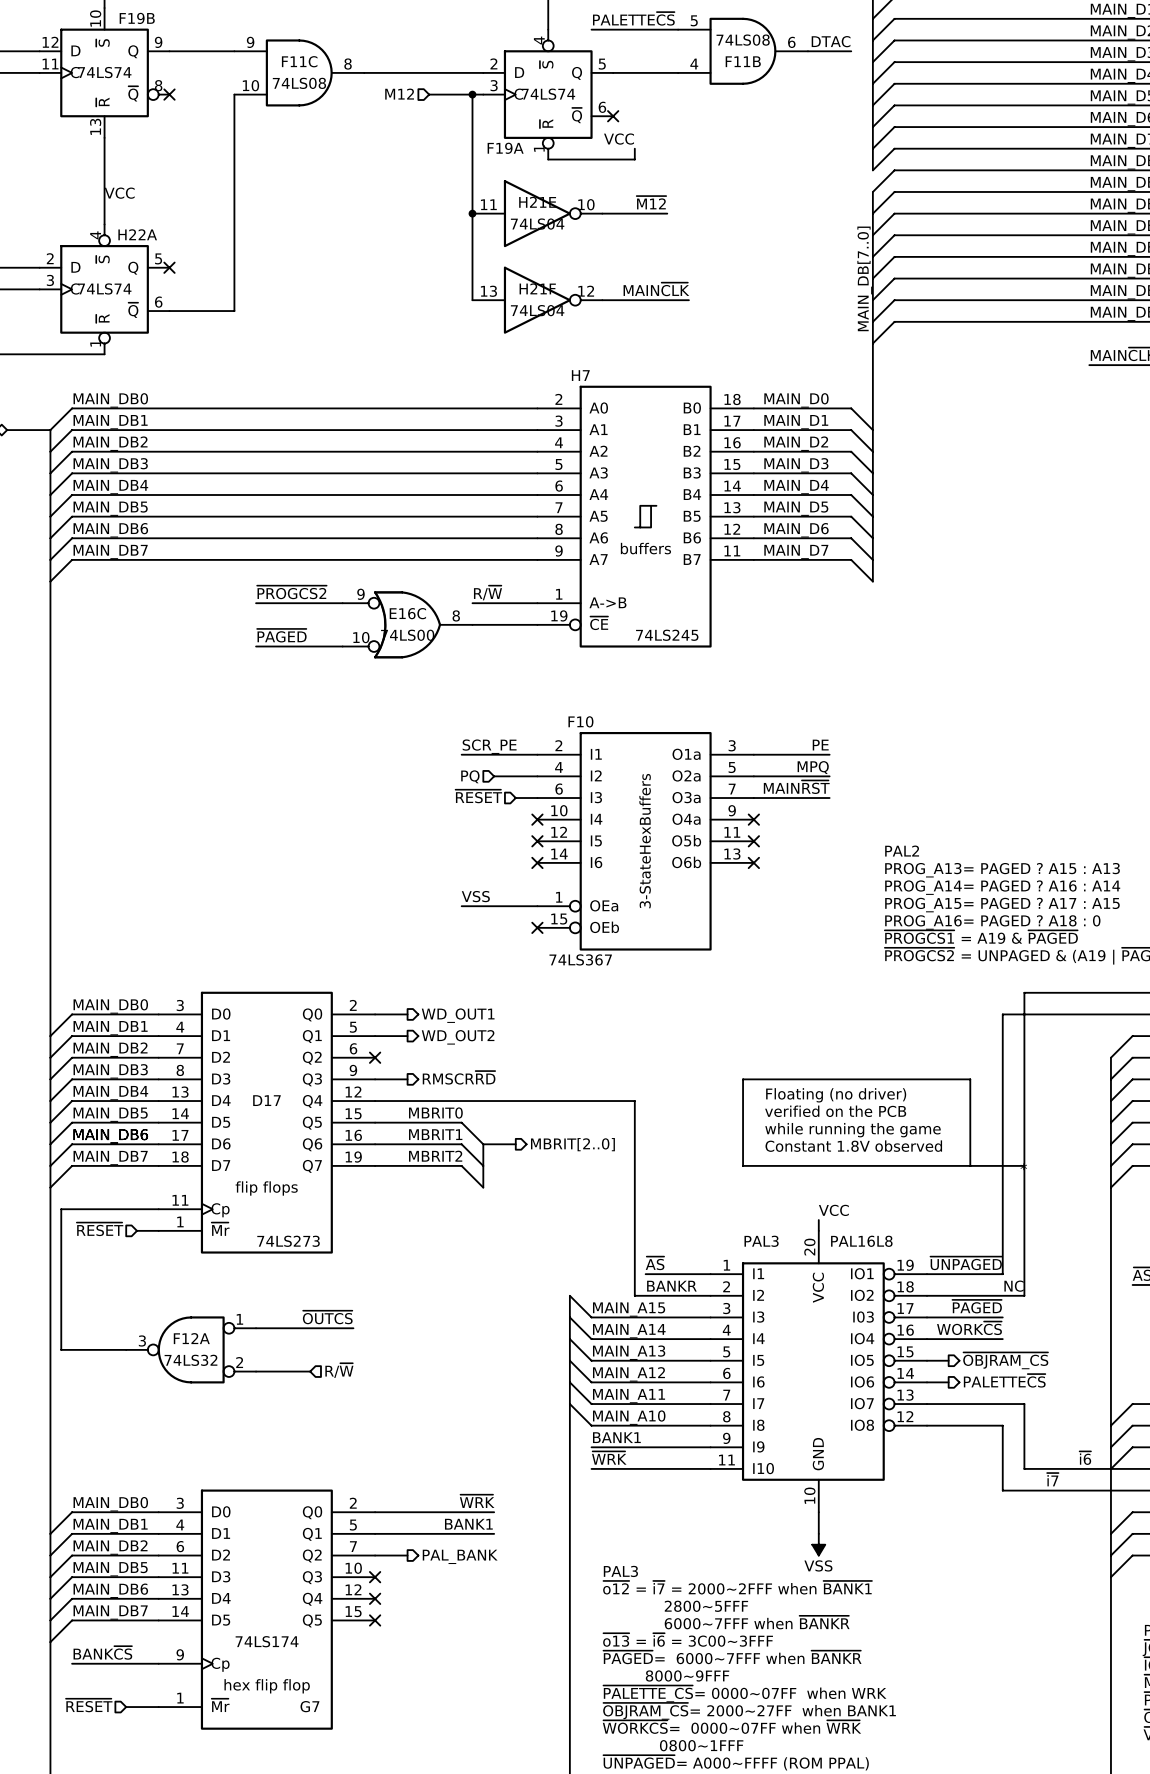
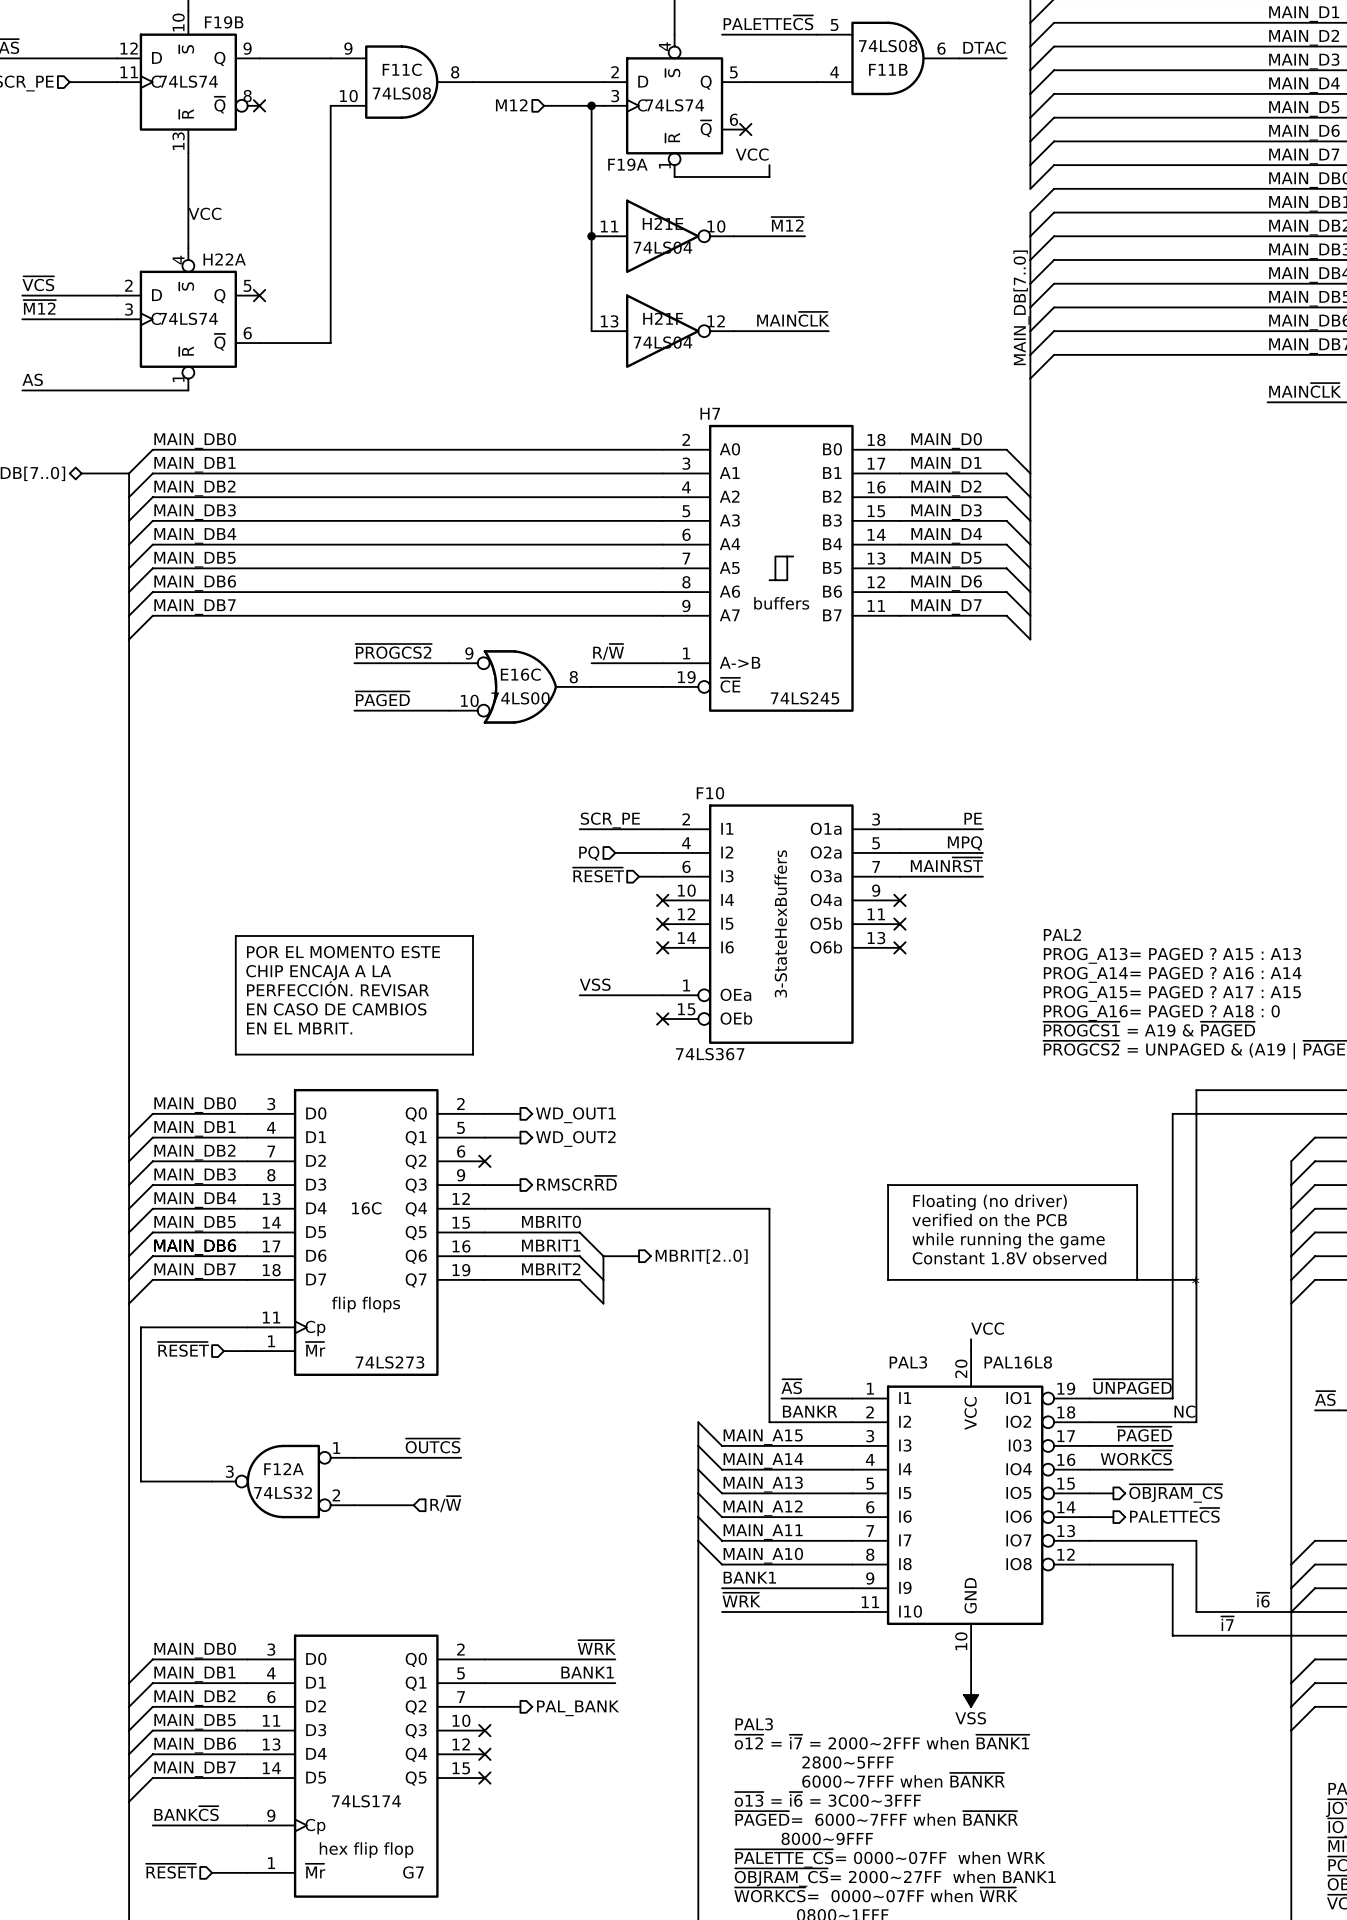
line: none -> (235, 935) (472, 935) (472, 1054) (235, 1054) (235, 935)
text: none -> POR EL MOMENTO ESTE (343, 952)
text: none -> CHIP ENCAJA A LA (318, 972)
text: none -> PERFECCIÓN. REVISAR (338, 988)
text: none -> EN CASO DE CAMBIOS (336, 1009)
text: none -> EN EL MBRIT. (299, 1028)
D17 name: D17 (266, 1100) -> 16C (366, 1208)

